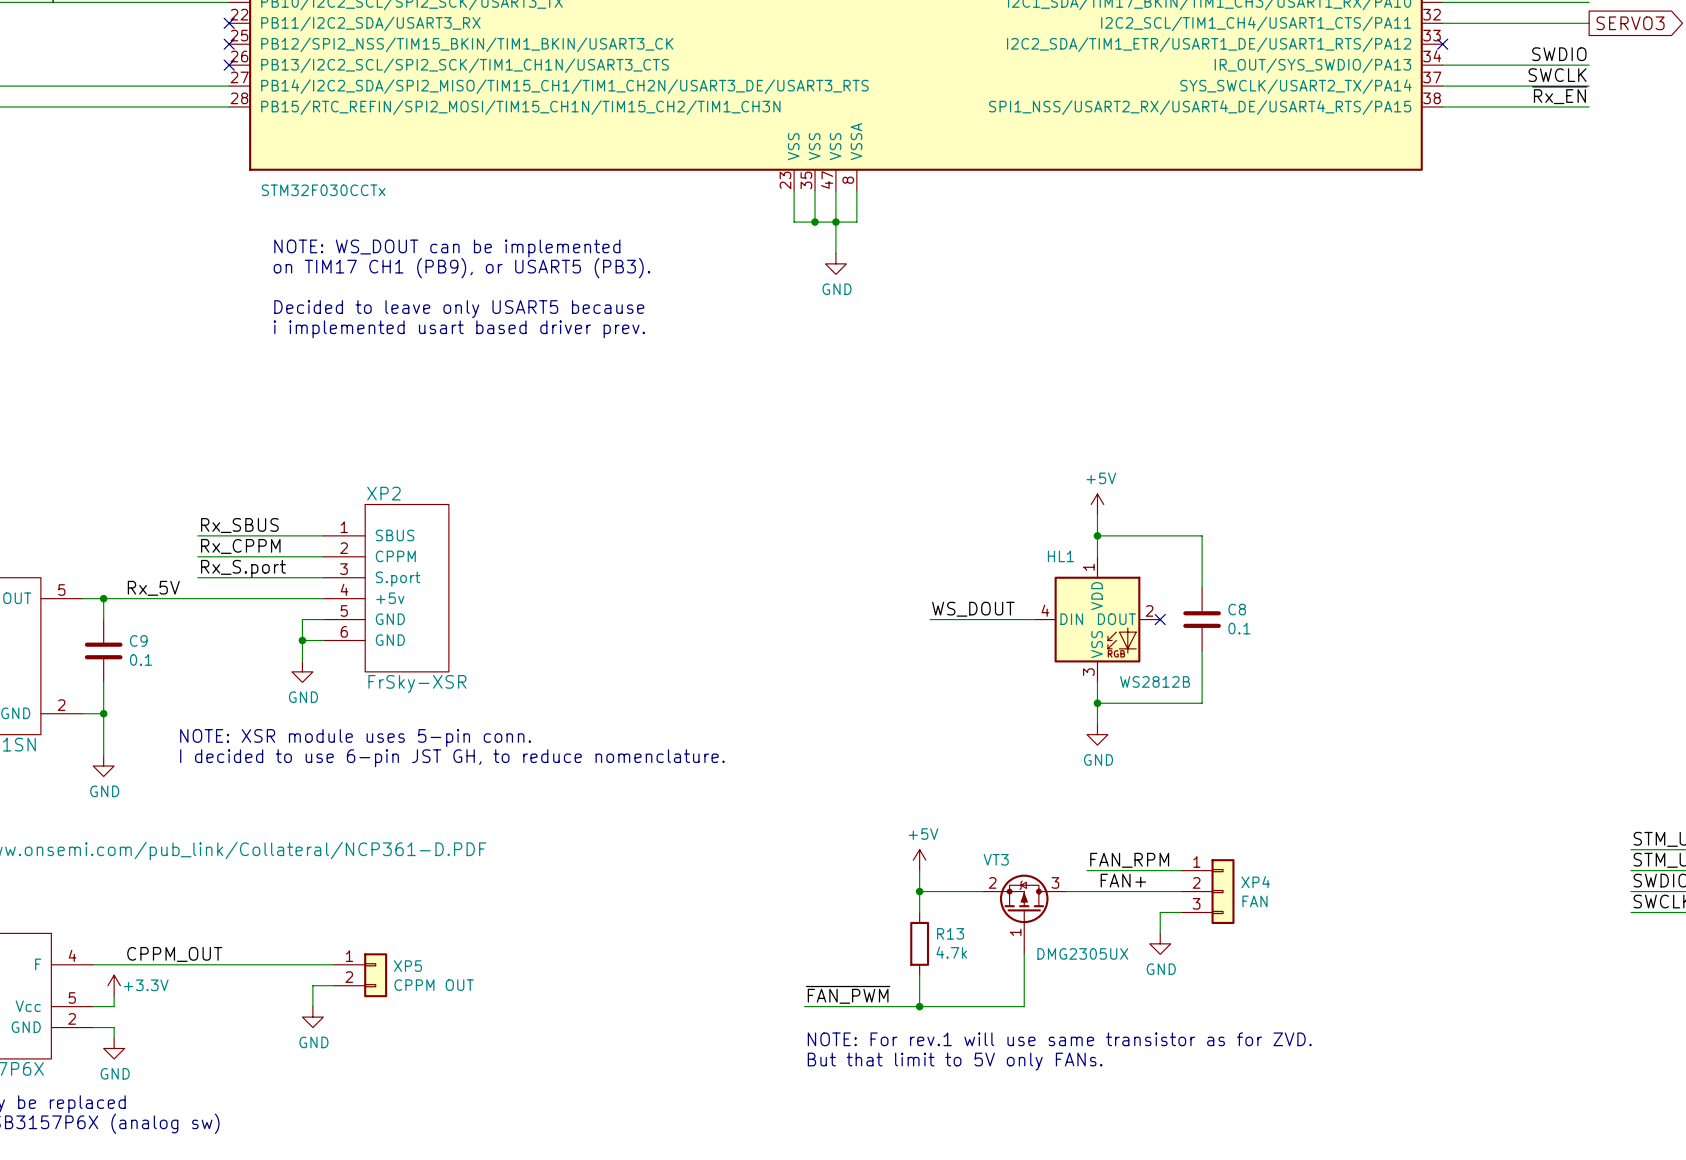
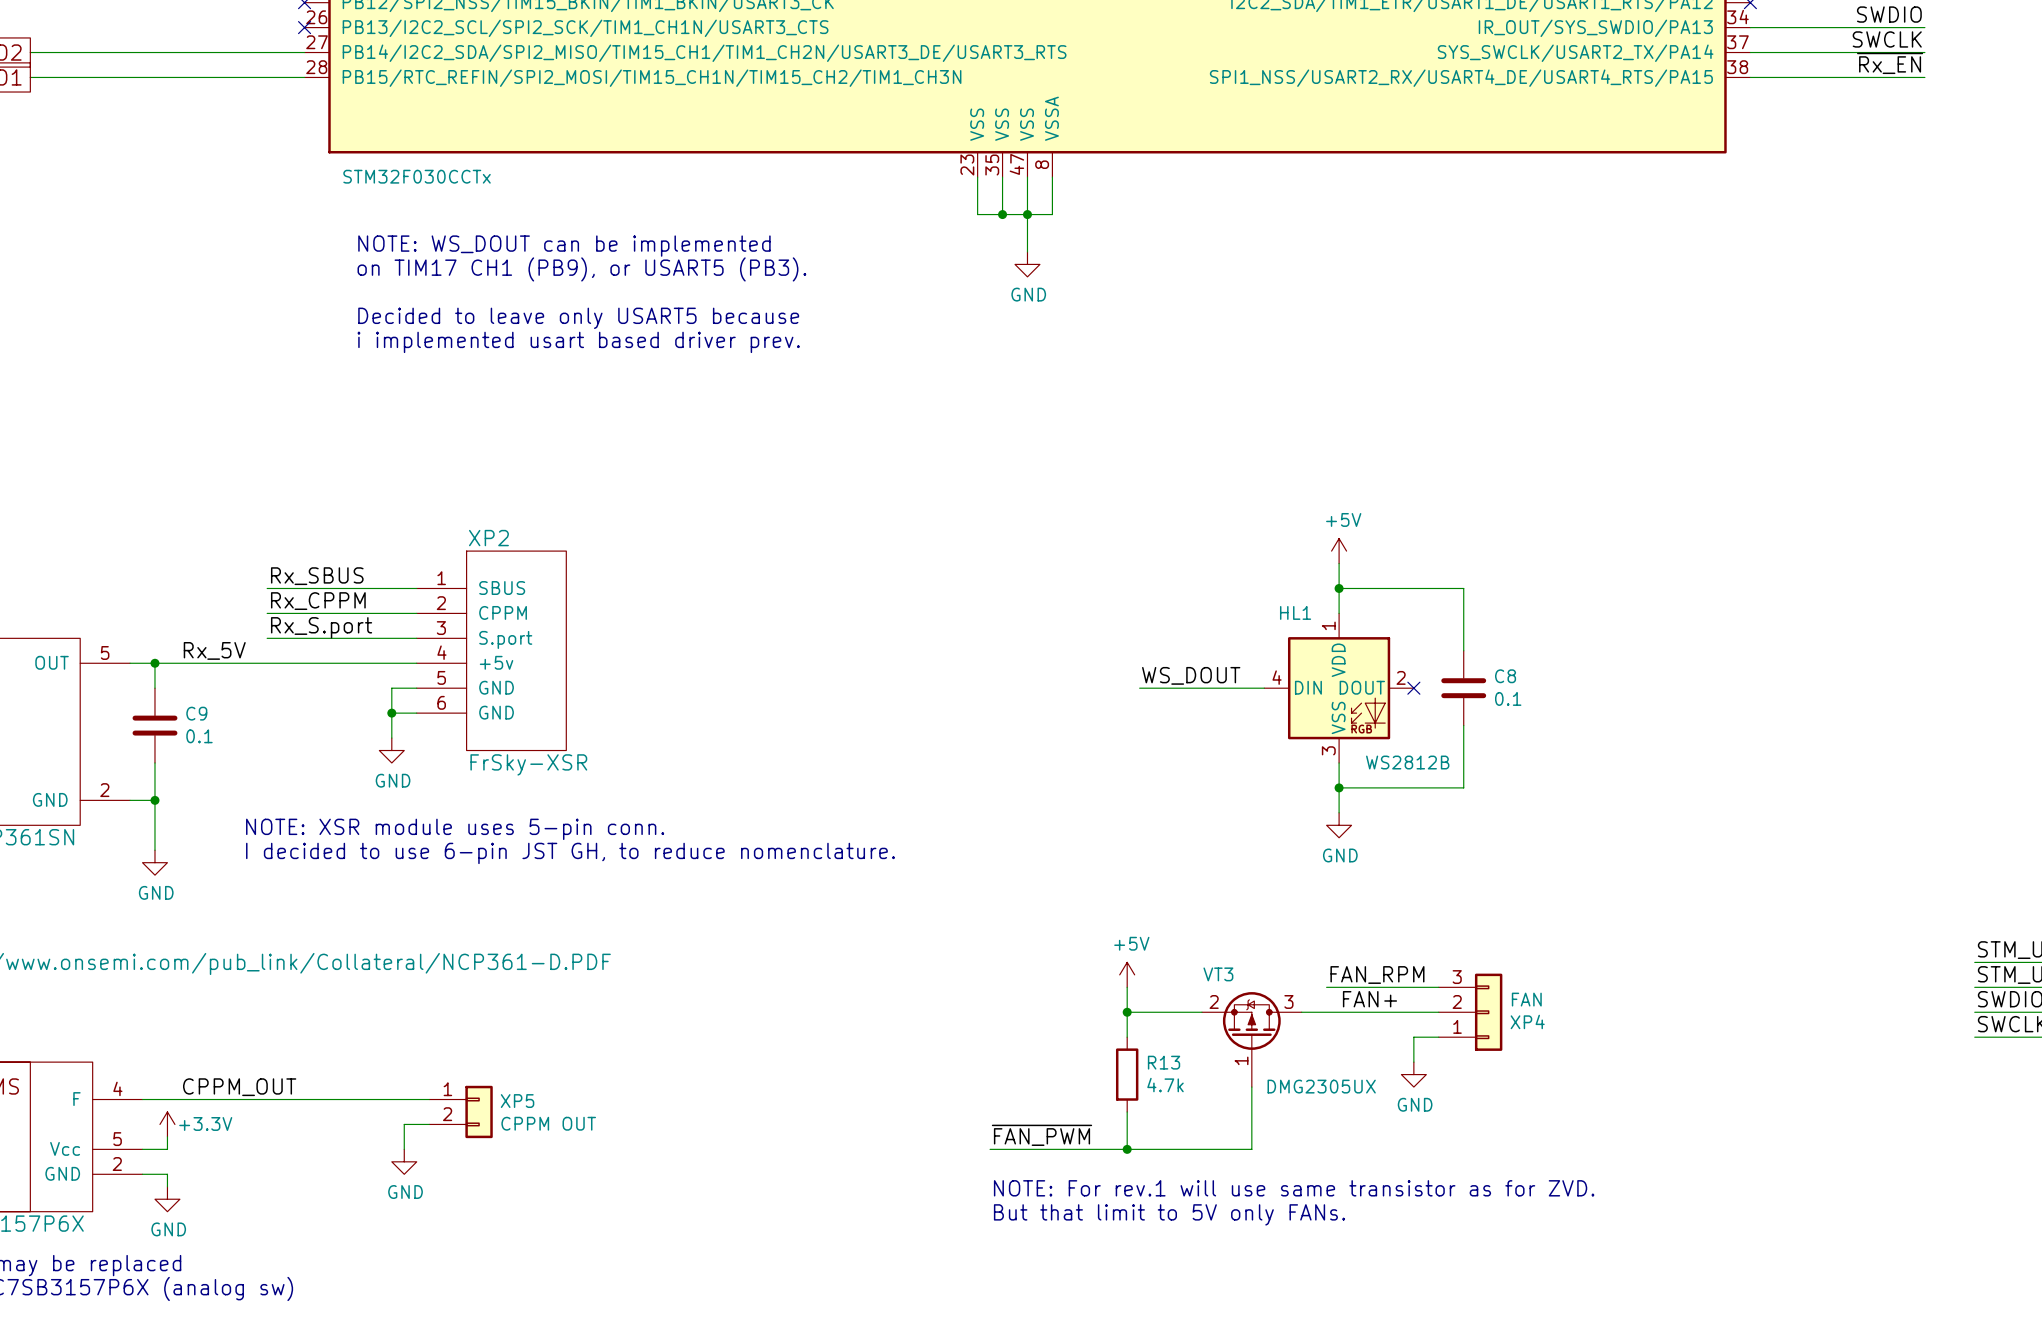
XP4 flip: as is (1223, 891) -> up-down (1488, 1012)

